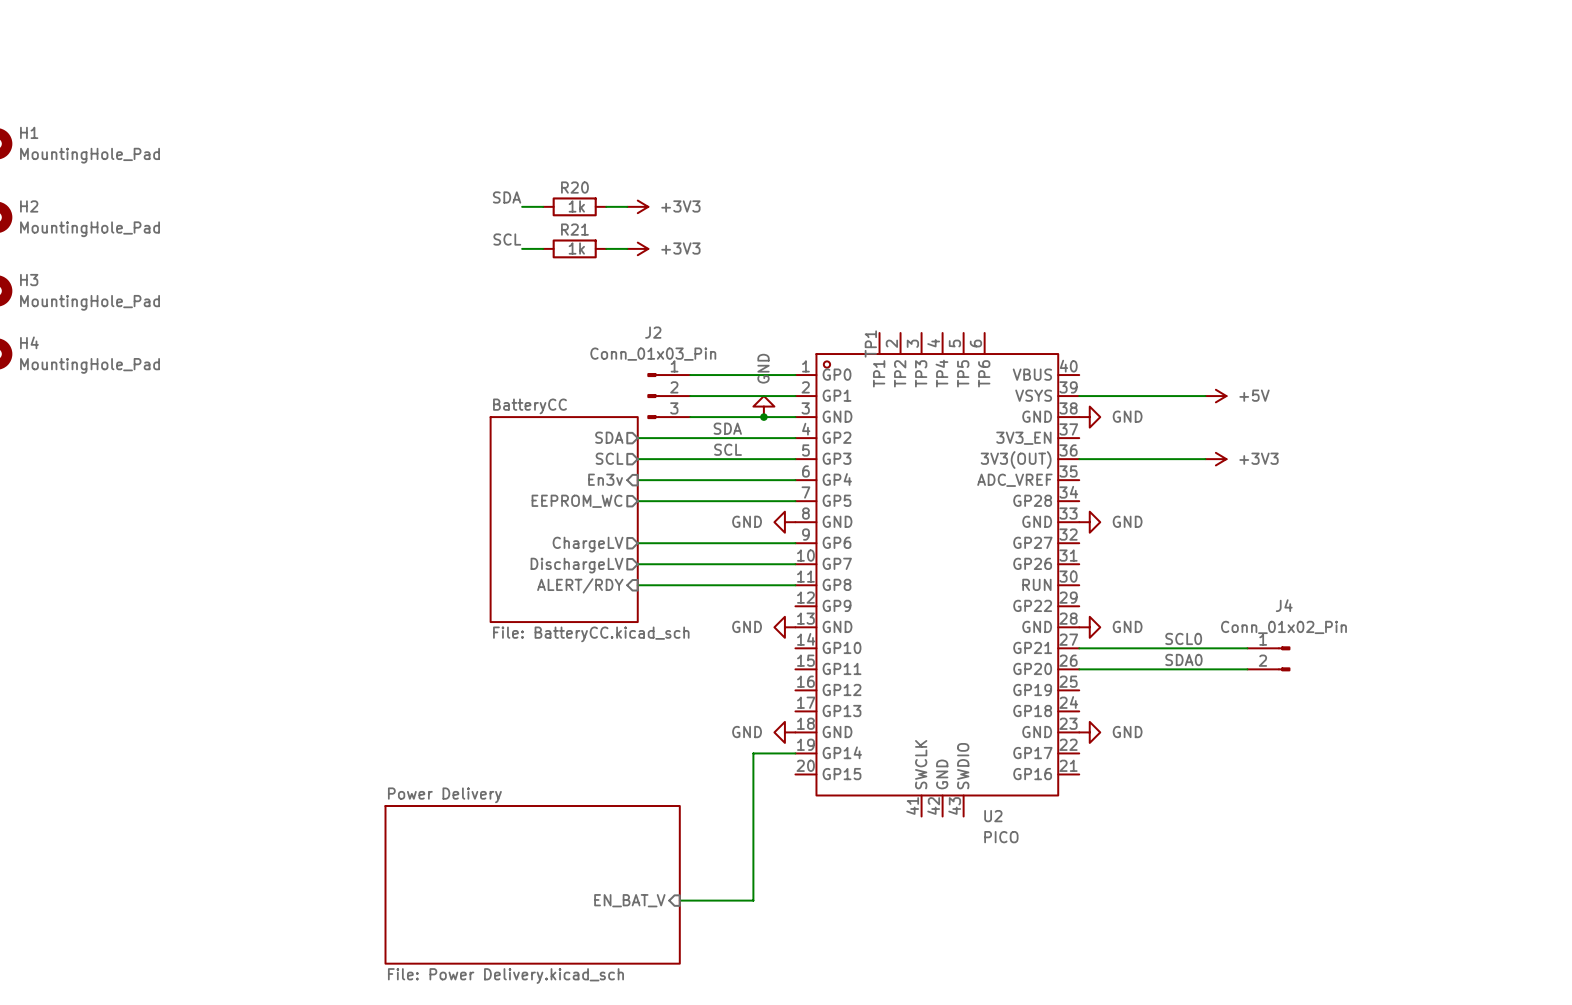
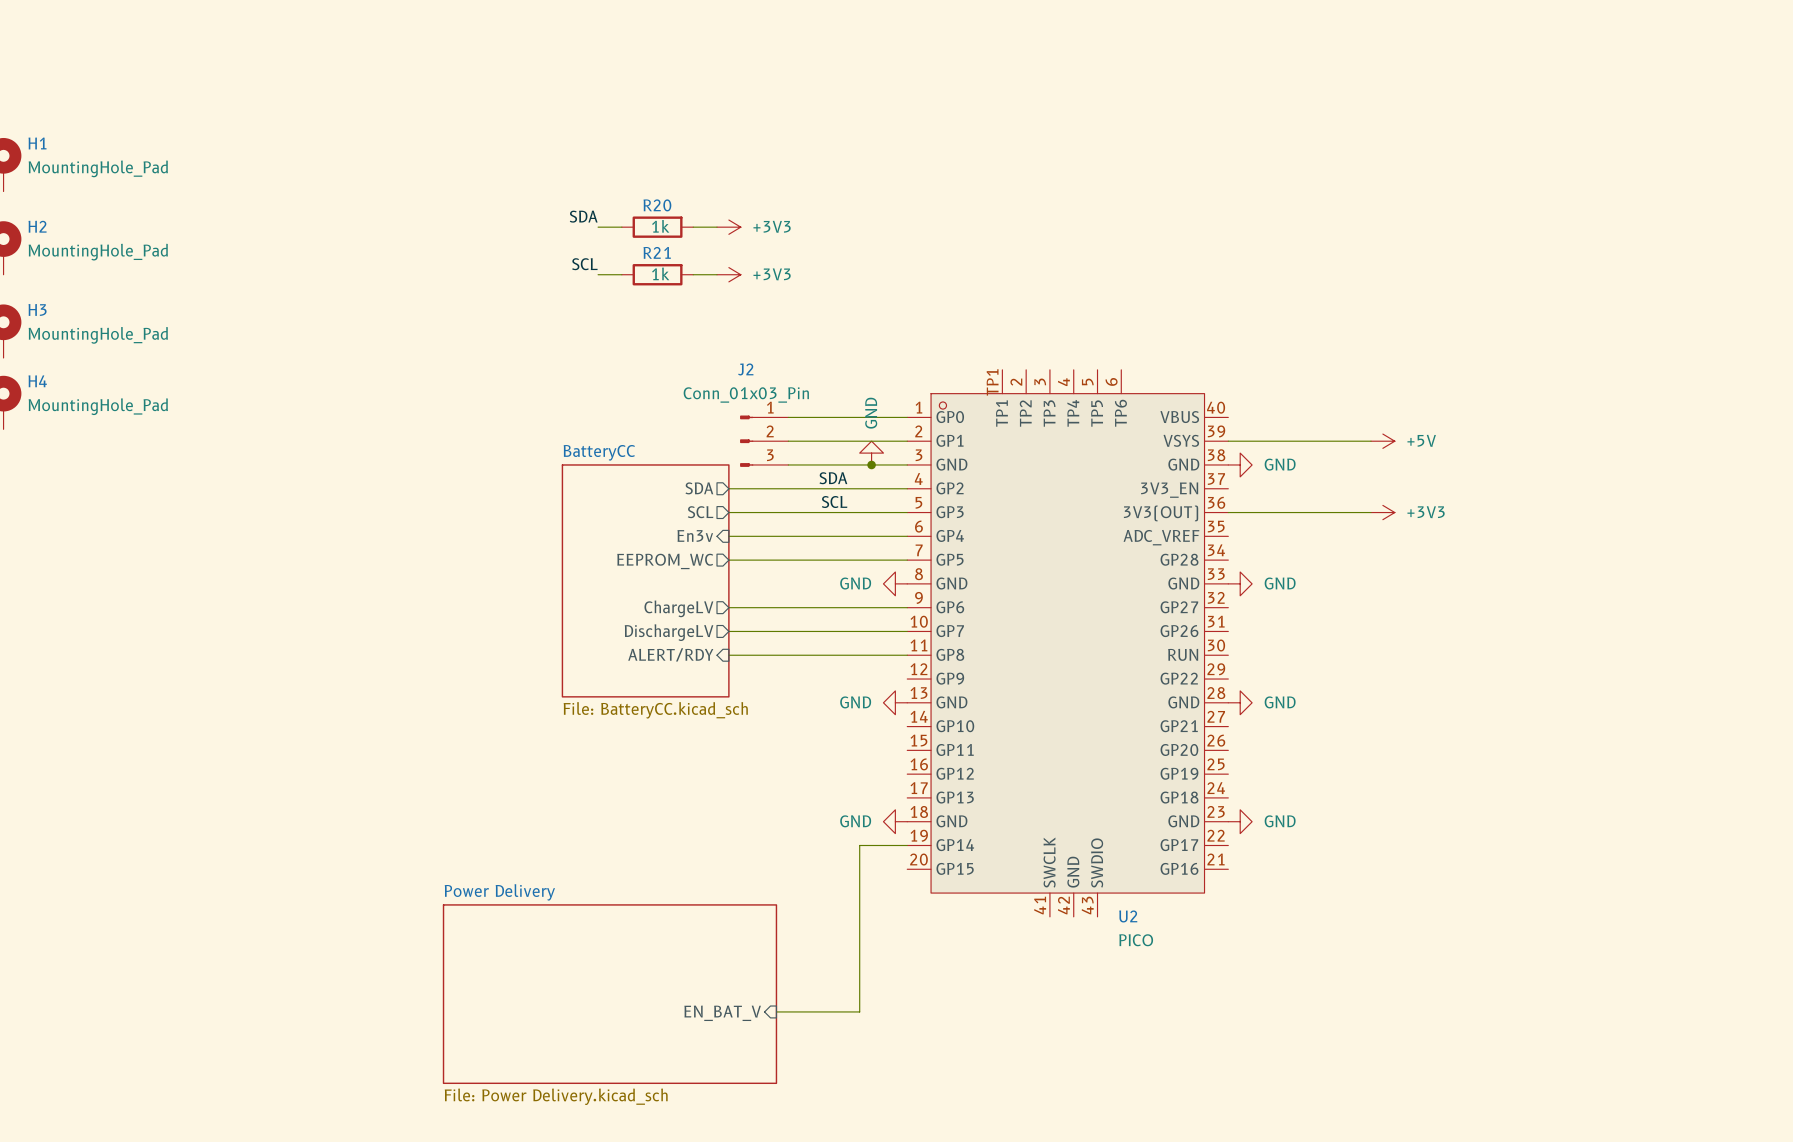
label: SCL0 (1183, 638) -> none
wire: (1079, 648) (1247, 648) -> none
J4: Conn_01x02_Pin (1268, 658) -> none
label: SDA0 (1183, 659) -> none
wire: (1079, 669) (1247, 669) -> none

